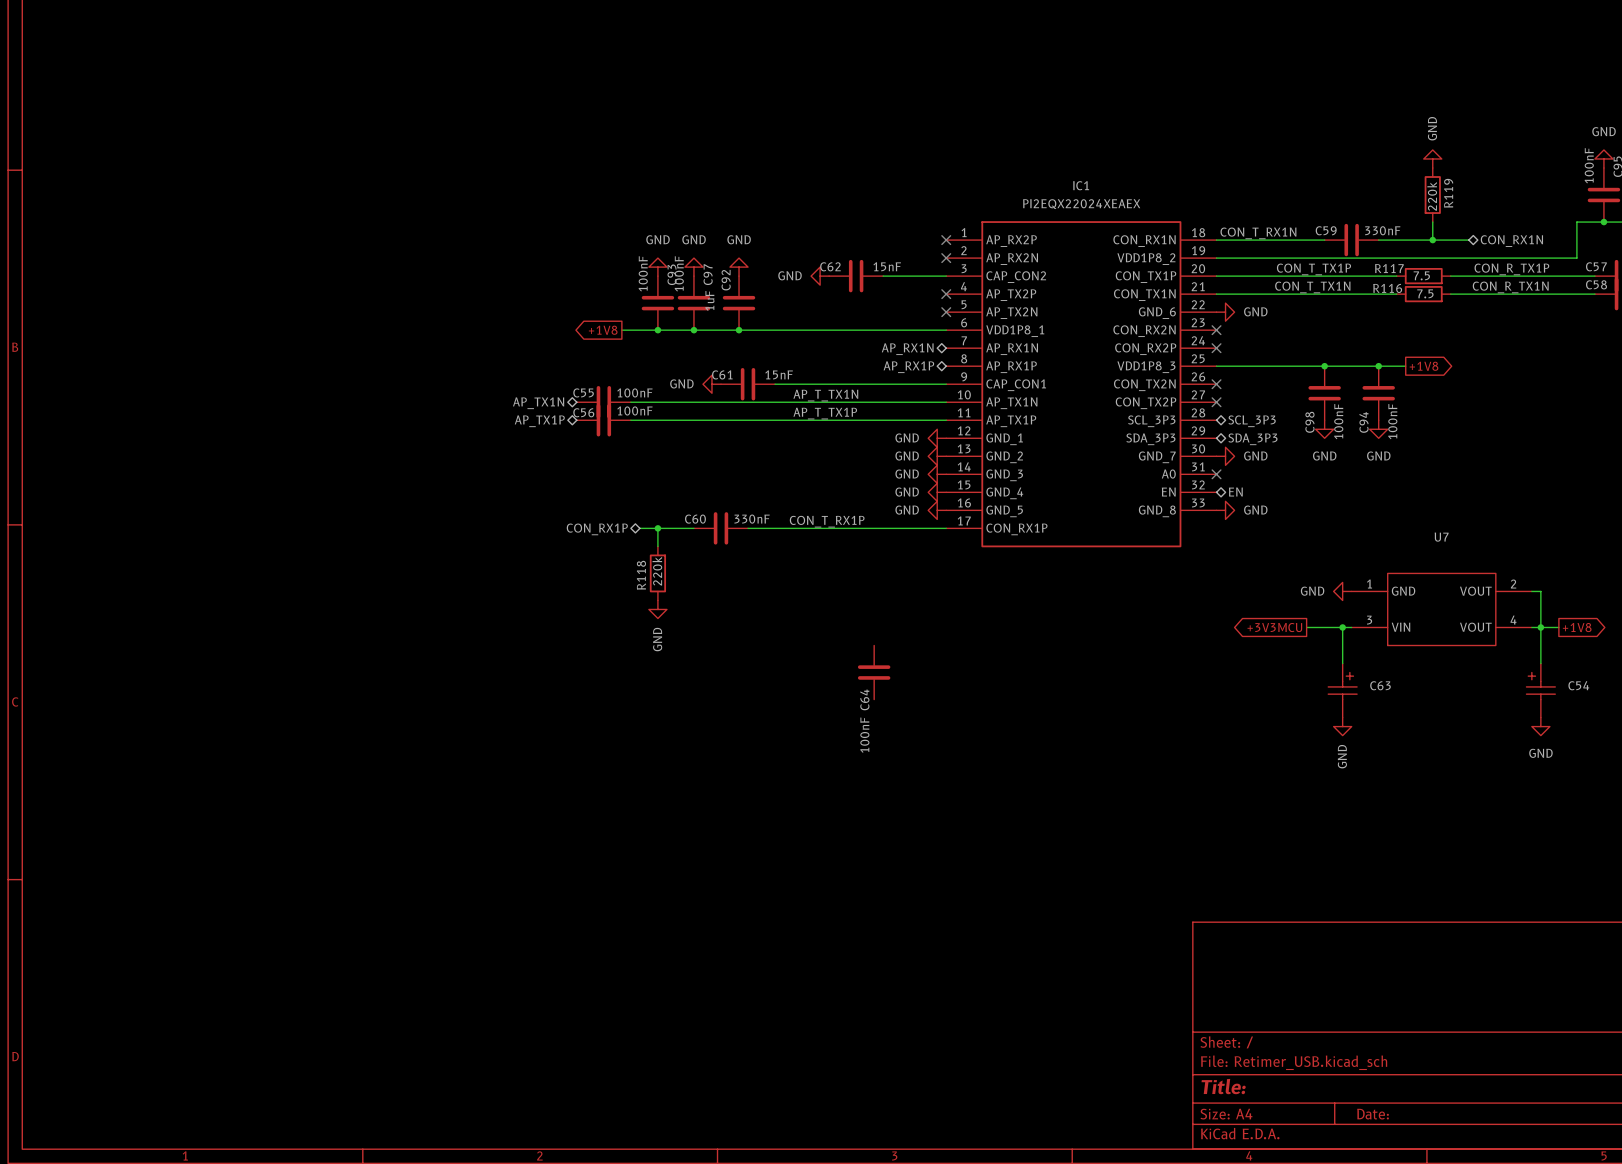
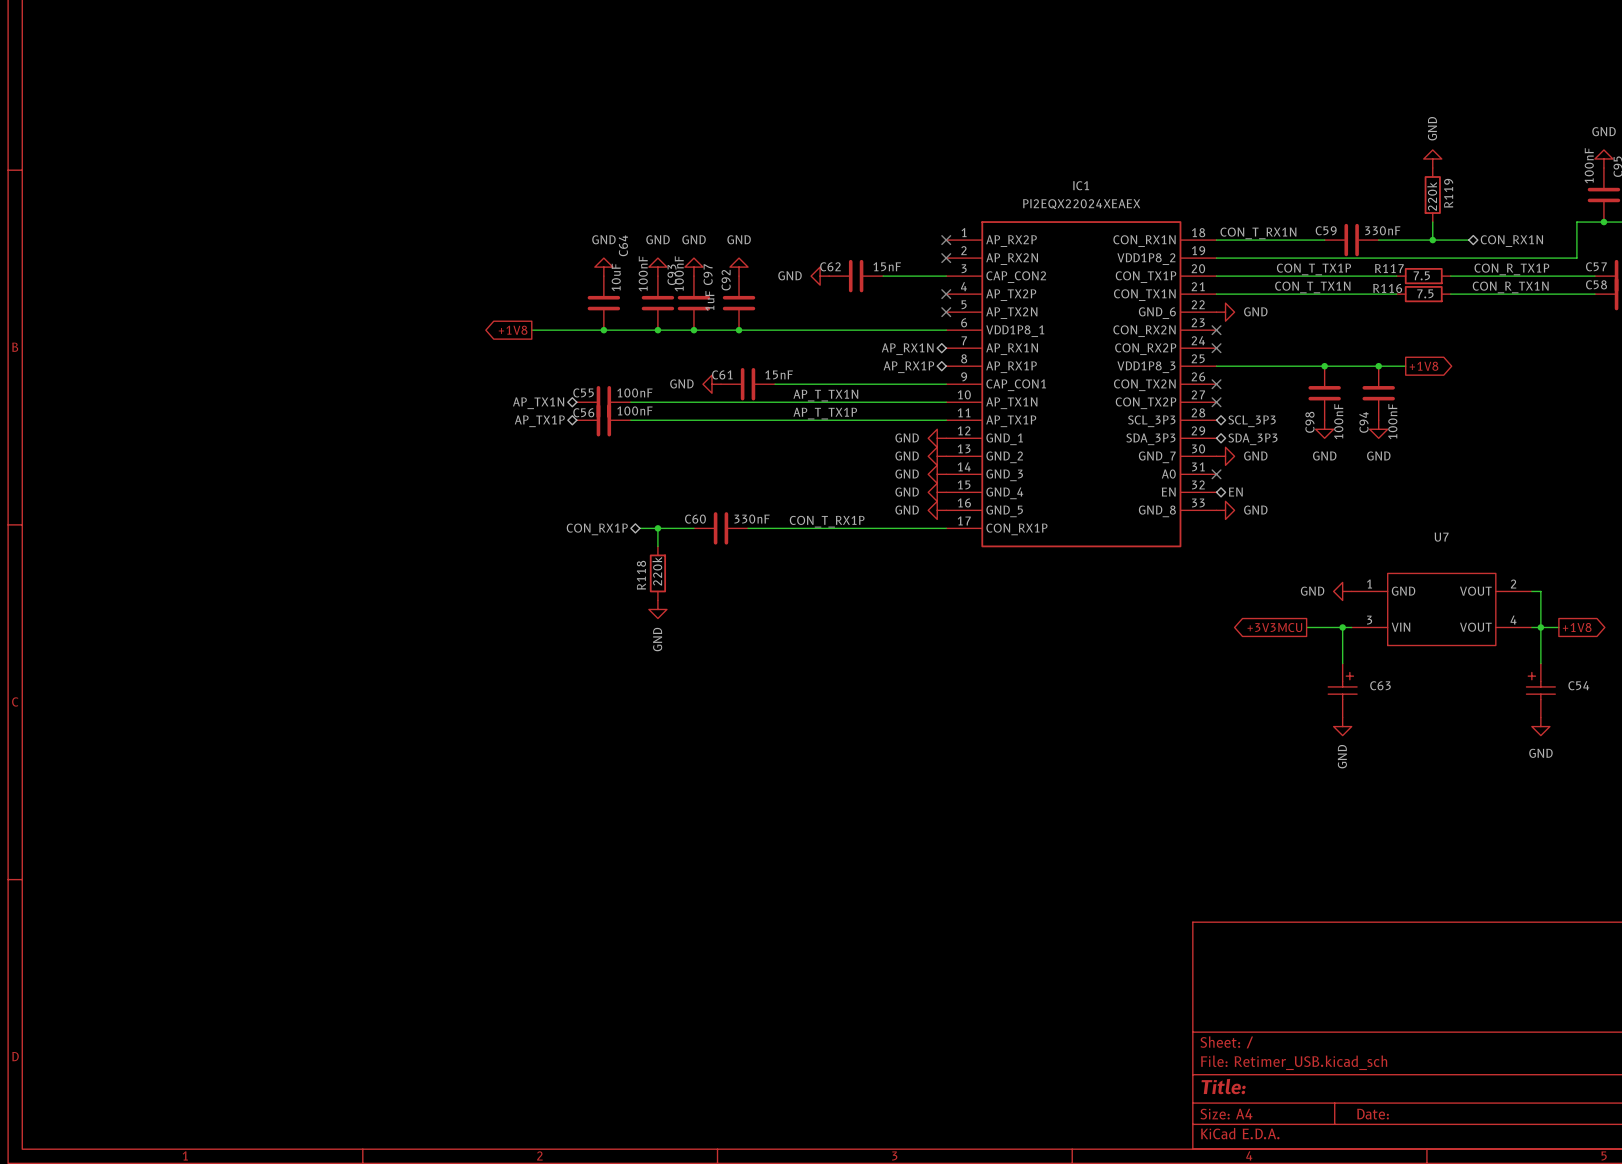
power symbol: none -> GND (603, 267)
wire: none -> (531, 330) (621, 330)
global label position: +1V8 (603, 330) -> +1V8 (513, 330)
junction: none -> (603, 330)
C64 position: (874, 672) -> (603, 303)
C64 name position: C64 (864, 699) -> C64 (623, 245)
C64 value: 100nF (864, 735) -> 10uF (616, 277)

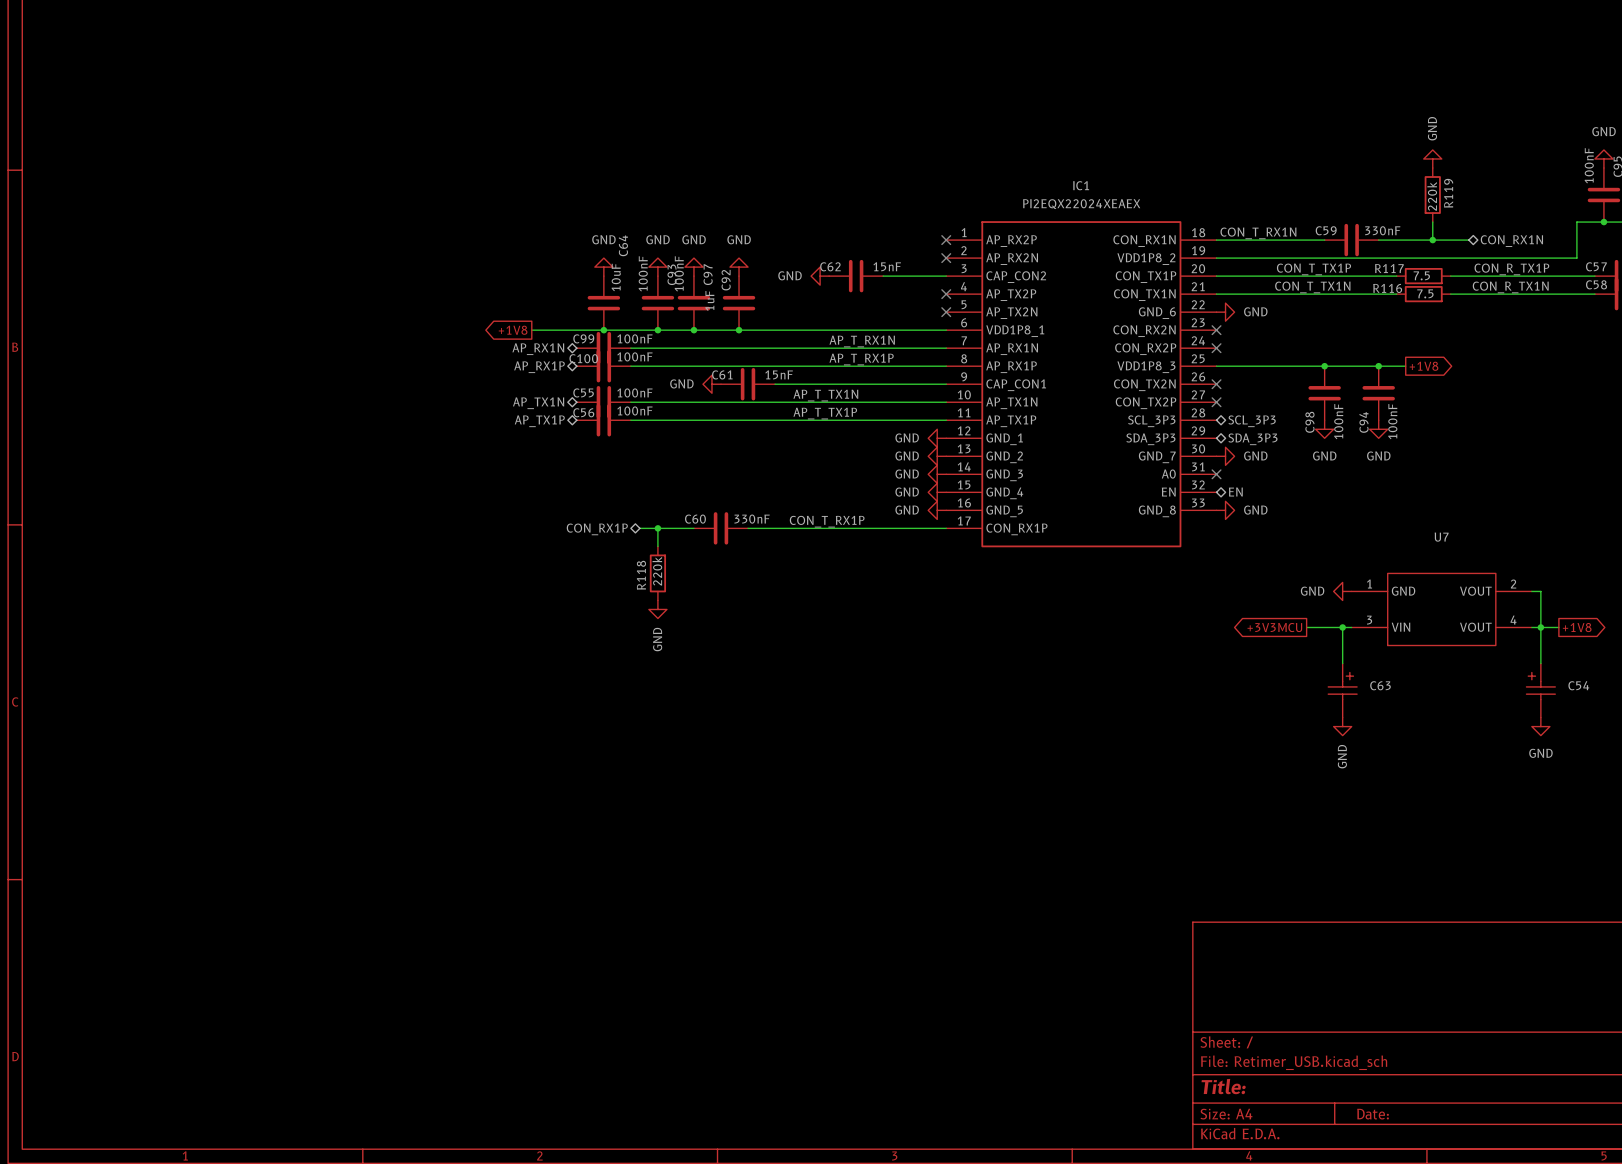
label: none -> AP_T_RX1N (862, 341)
C99: none -> 100nF (603, 348)
wire: none -> (630, 348) (946, 348)
hierarchical label: none -> AP_RX1N (538, 349)
hierarchical label: AP_RX1N (907, 349) -> none
label: none -> AP_T_RX1P (861, 359)
C100: none -> 100nF (603, 366)
wire: none -> (630, 366) (946, 366)
hierarchical label: none -> AP_RX1P (539, 367)
hierarchical label: AP_RX1P (908, 367) -> none

